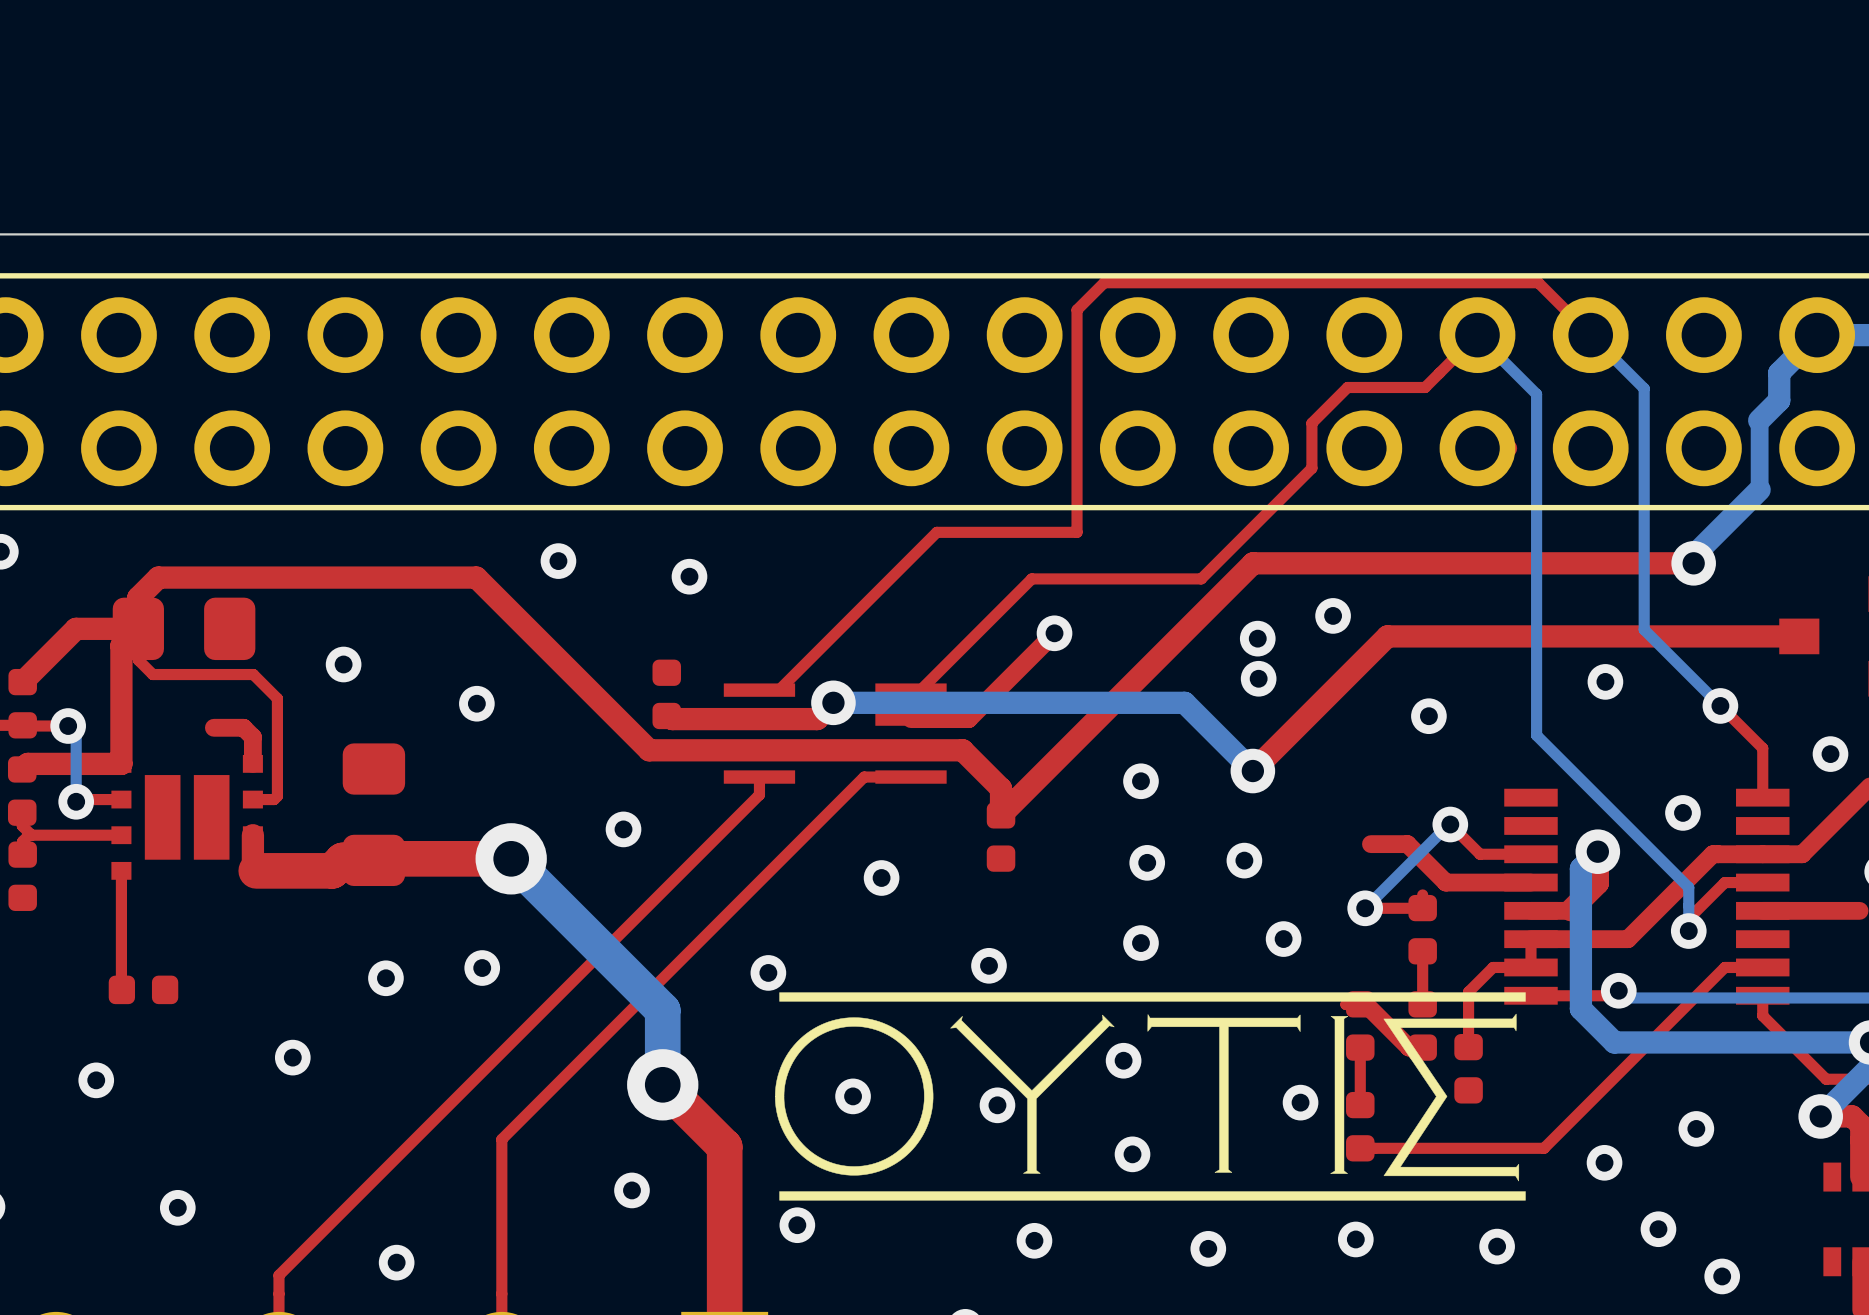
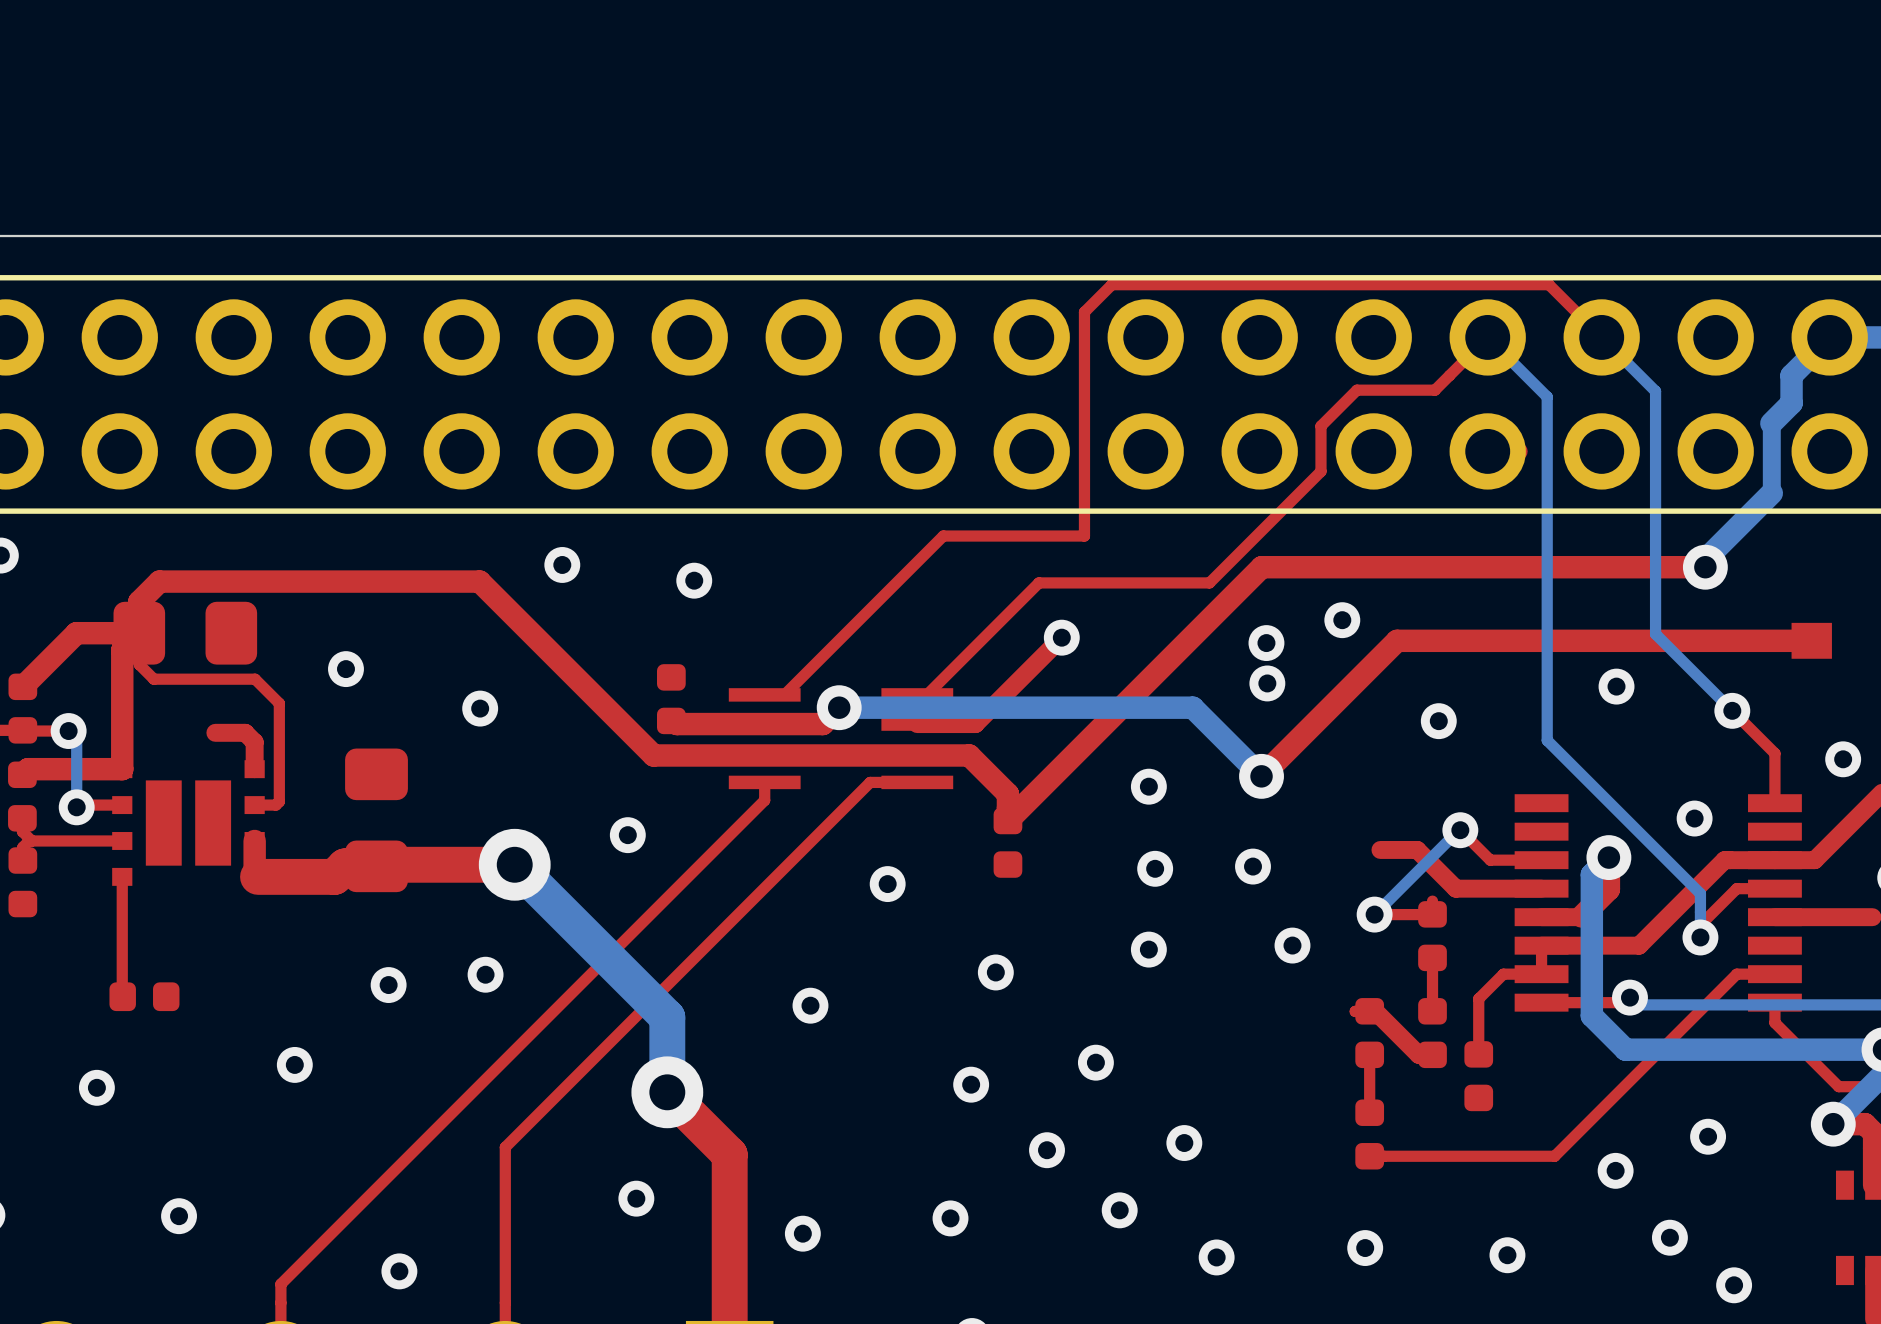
via position: (768, 972) -> (810, 1005)
drawing: [775, 992, 1526, 1201] -> none
via position: (1123, 1060) -> (1095, 1062)
via: (853, 1096) -> none
via: (1300, 1102) -> none
via position: (997, 1105) -> (971, 1084)
via: none -> (1184, 1143)
via: none -> (1047, 1150)
via: (1132, 1154) -> none
via: none -> (1119, 1210)
via: none -> (950, 1218)
via: (1034, 1240) -> none

